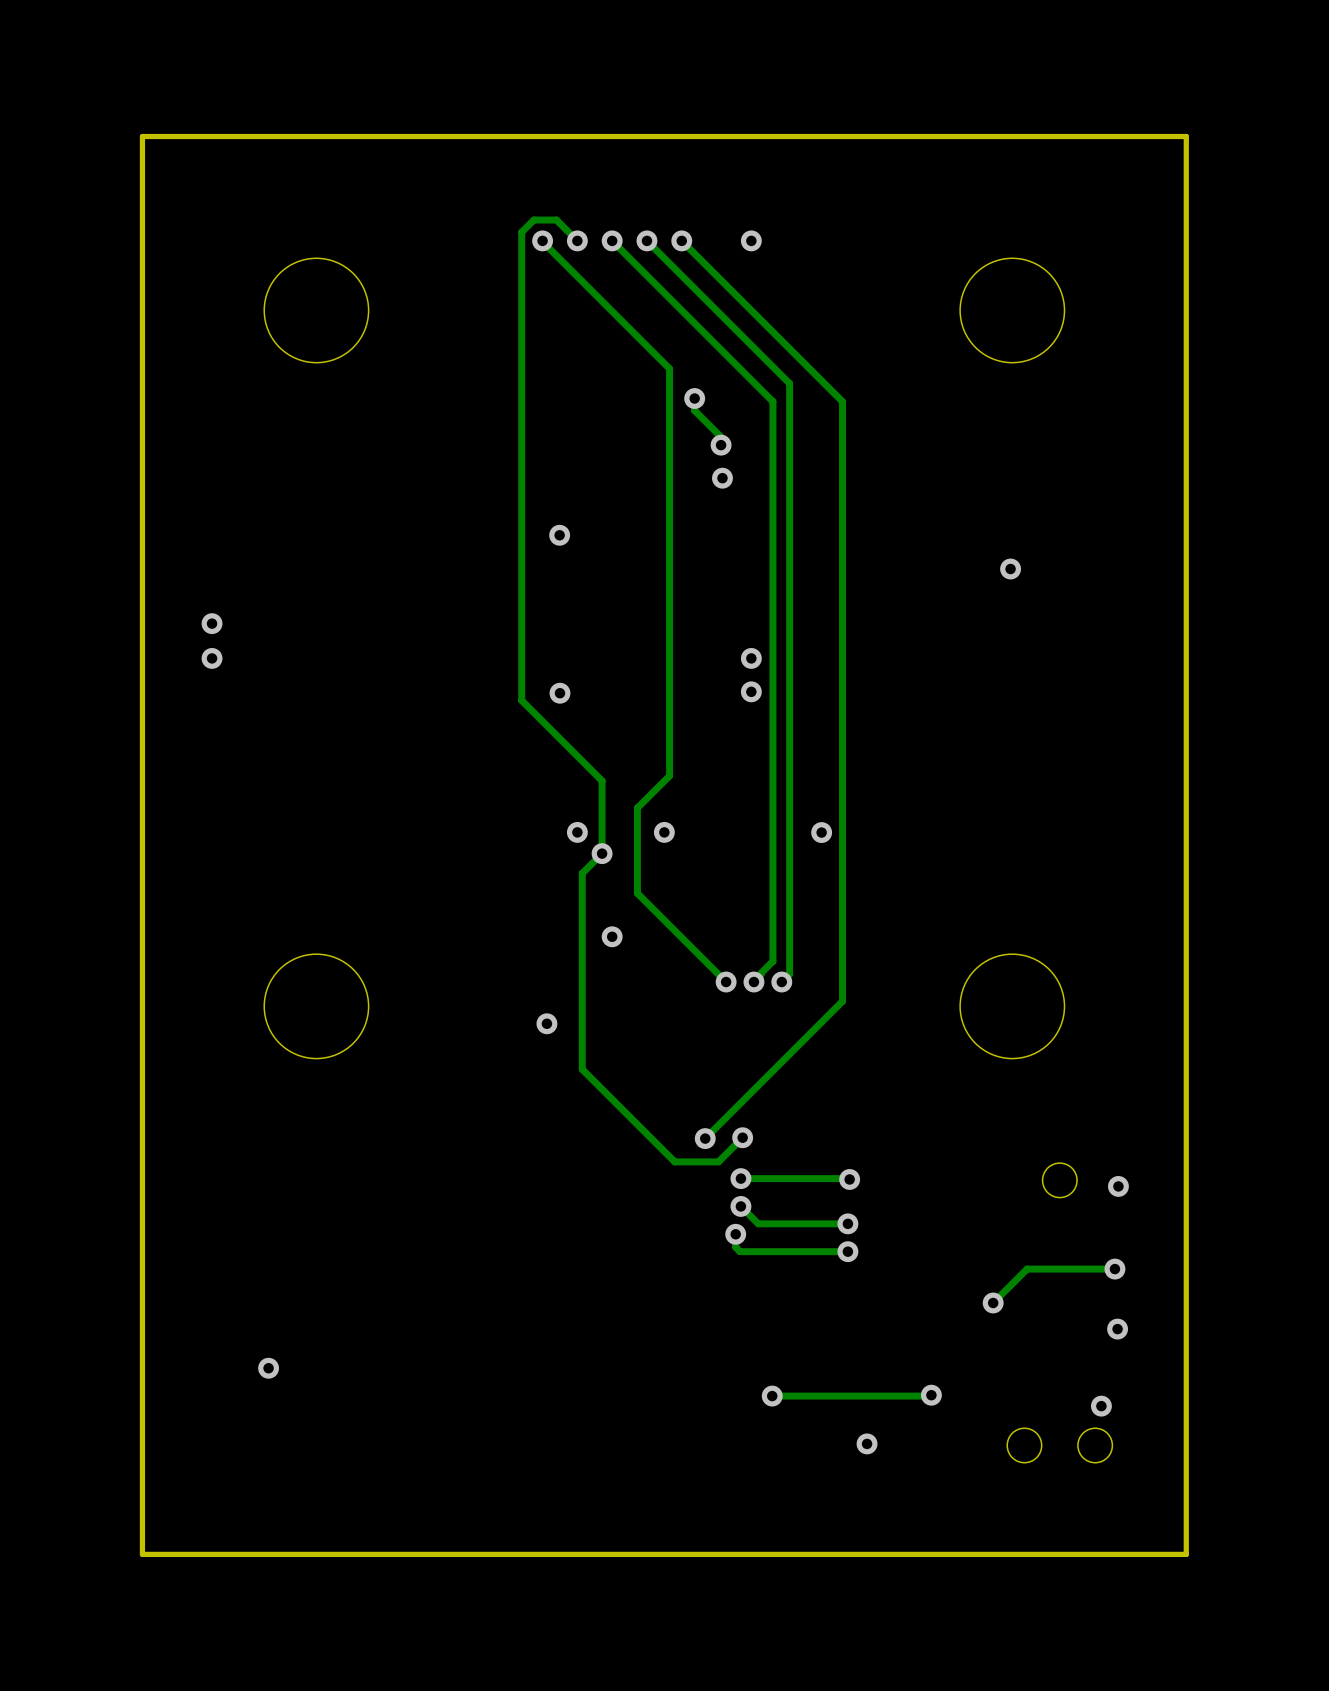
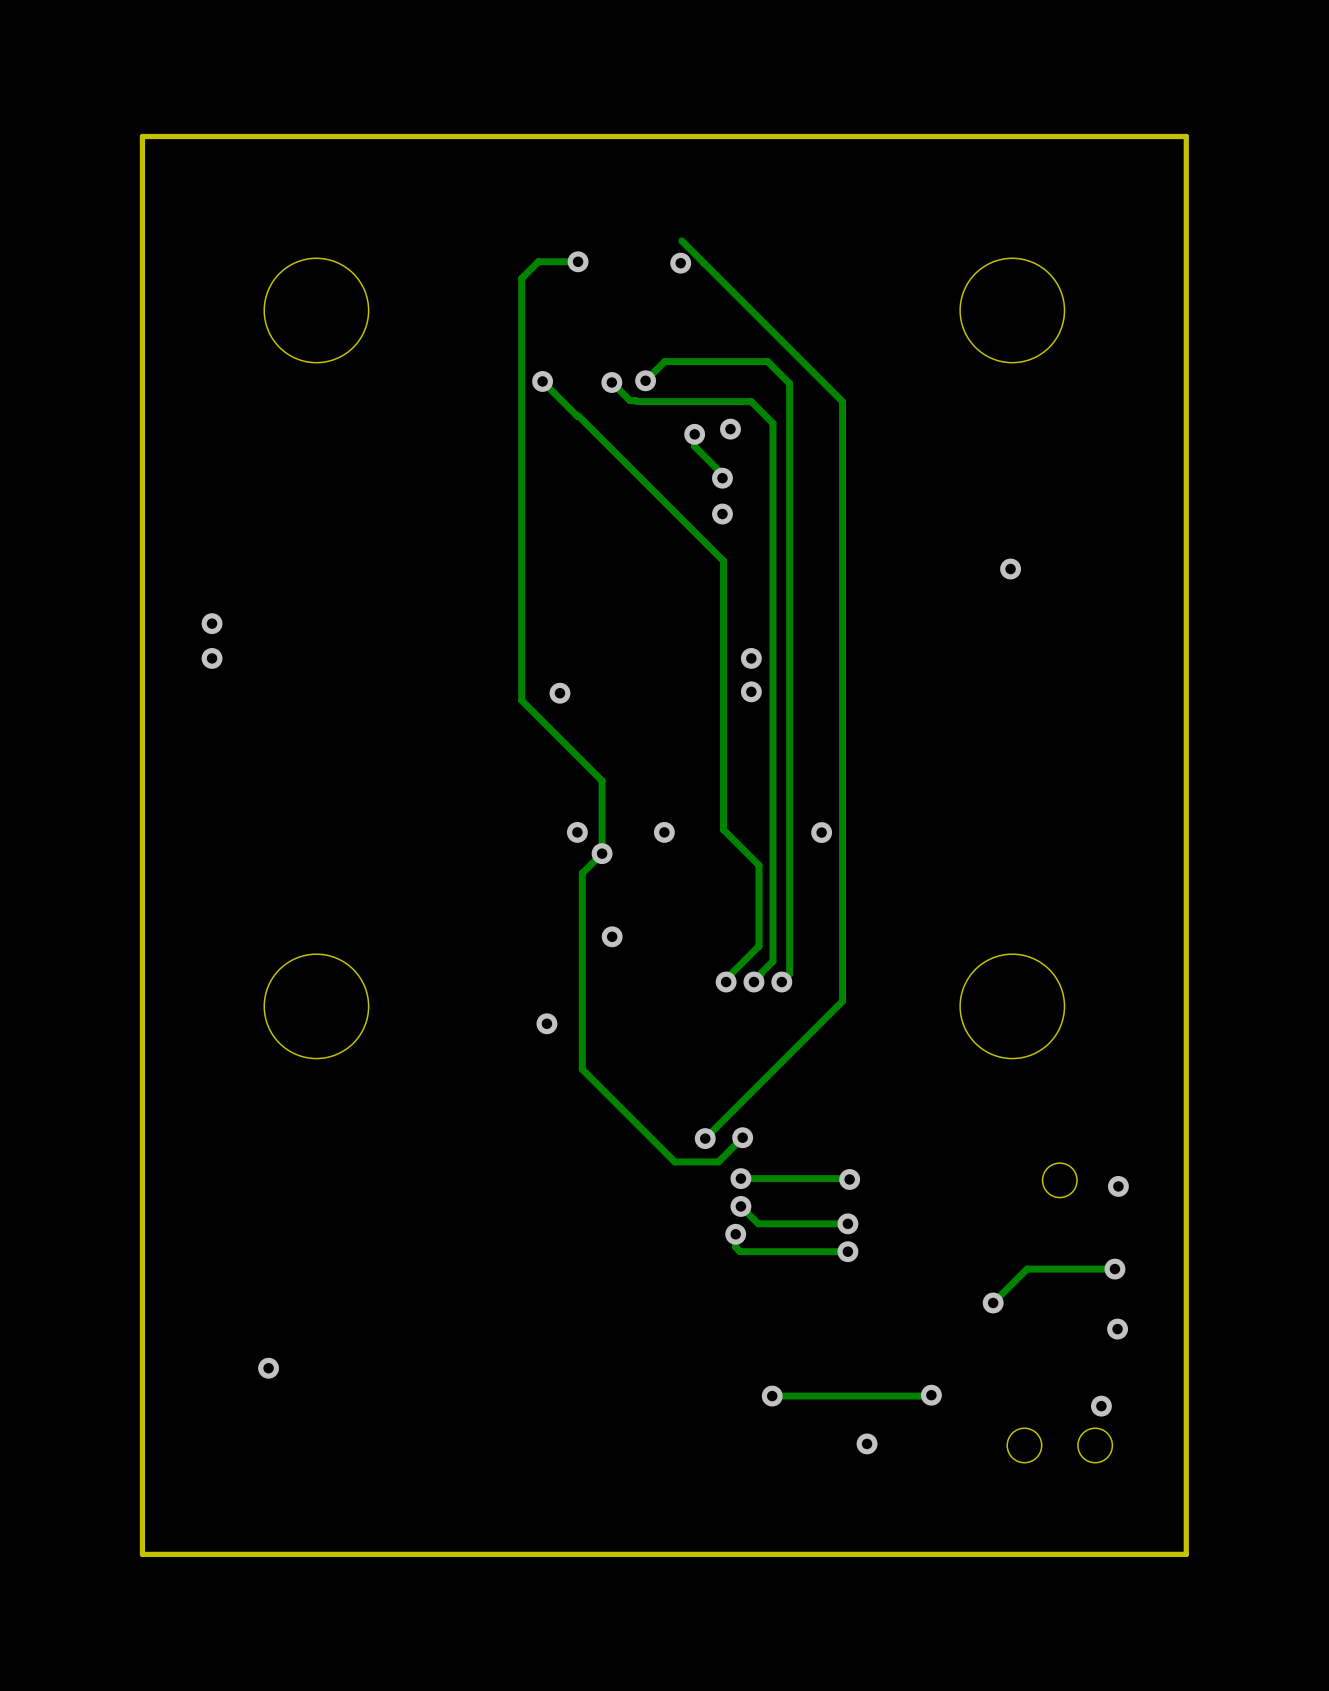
track: (542, 240) (669, 368) (669, 775) (637, 808) (637, 893) (726, 982) -> (542, 381) (723, 561) (723, 829) (759, 865) (759, 946) (726, 979) (726, 982)
via: (542, 240) -> none
track: (577, 240) (556, 220) (533, 220) (521, 232) (521, 278) -> (578, 261) (538, 261) (521, 278)
via position: (577, 240) -> (578, 261)
track: (612, 240) (772, 401) (772, 423) -> (611, 382) (629, 400) (636, 401) (751, 401) (772, 423)
via: (612, 240) -> none
track: (646, 240) (767, 361) -> (645, 380) (664, 361) (767, 361)
via: (646, 240) -> none
via: (681, 240) -> none
via: (751, 240) -> none
via: none -> (680, 263)
via: none -> (645, 380)
via: none -> (542, 381)
via: none -> (611, 382)
track: (694, 398) (694, 410) (721, 437) (721, 445) -> (694, 434) (694, 446) (721, 472) (721, 480)
via: (694, 398) -> none
via: none -> (694, 434)
via position: (721, 445) -> (730, 429)
via: none -> (722, 514)
via: (559, 535) -> none

